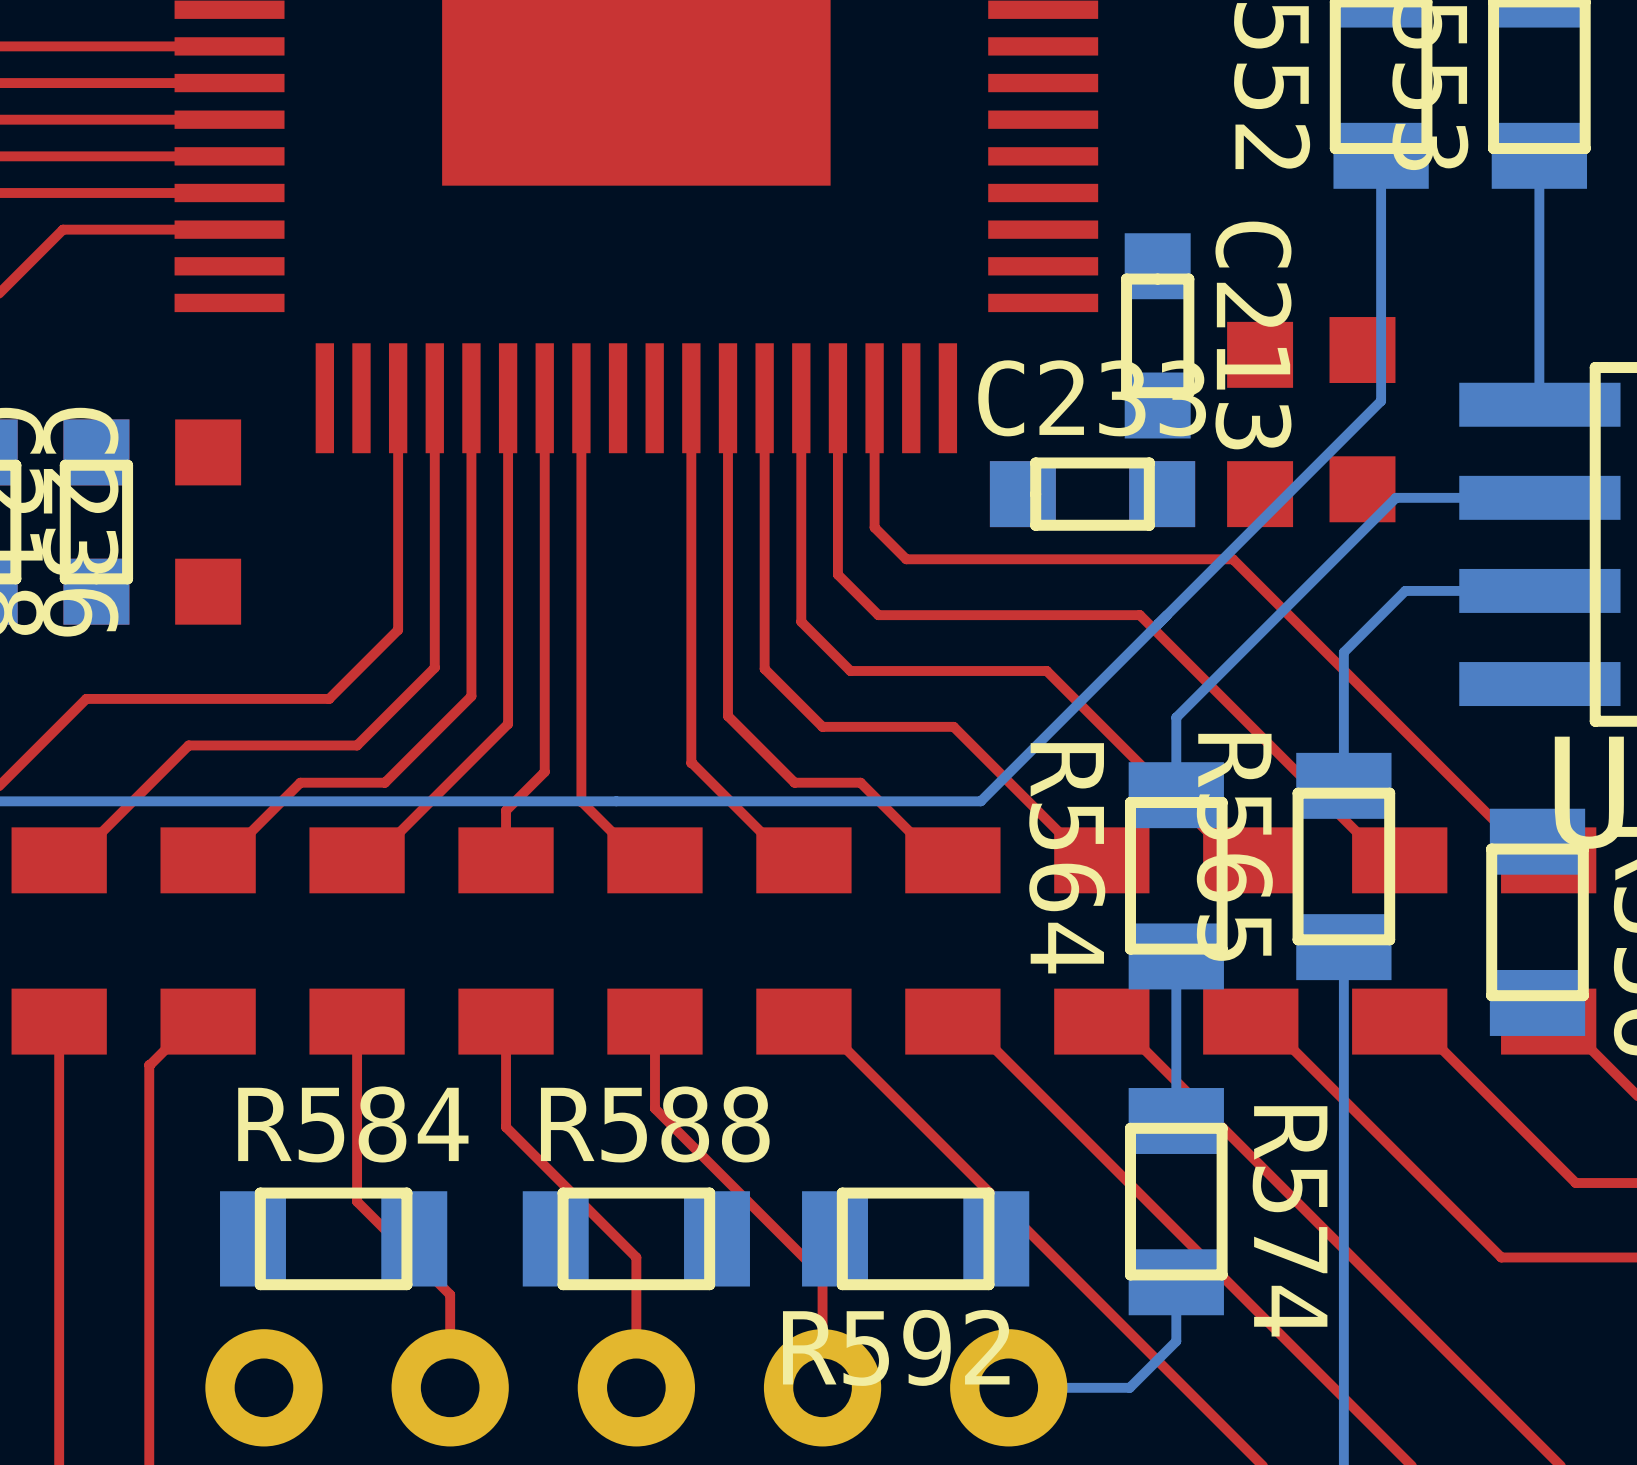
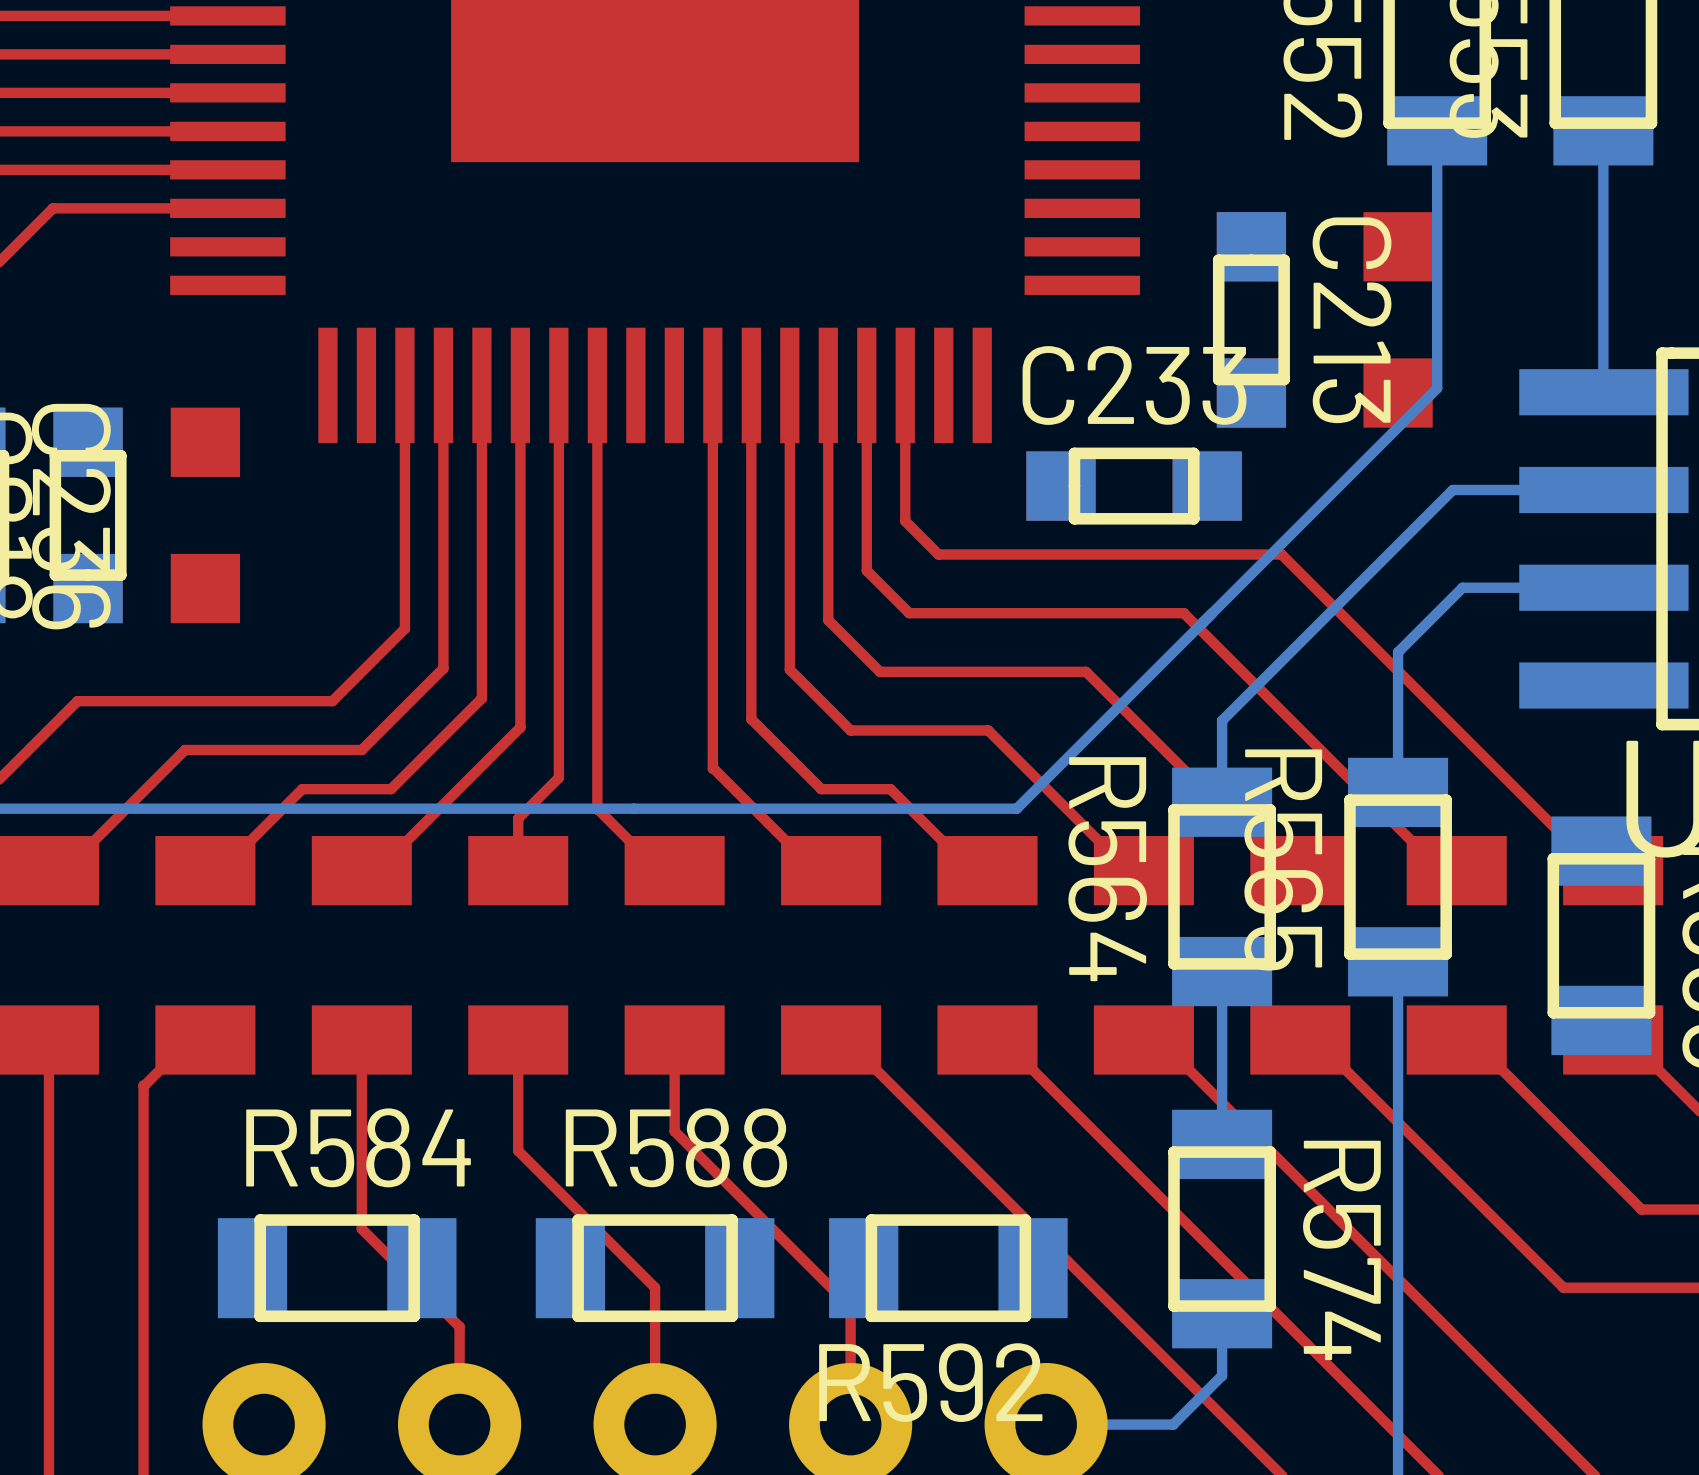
C213 position: (1157, 335) -> (1251, 319)
part: none -> (1398, 319)
part: (1362, 419) -> none
part: (1260, 424) -> none

